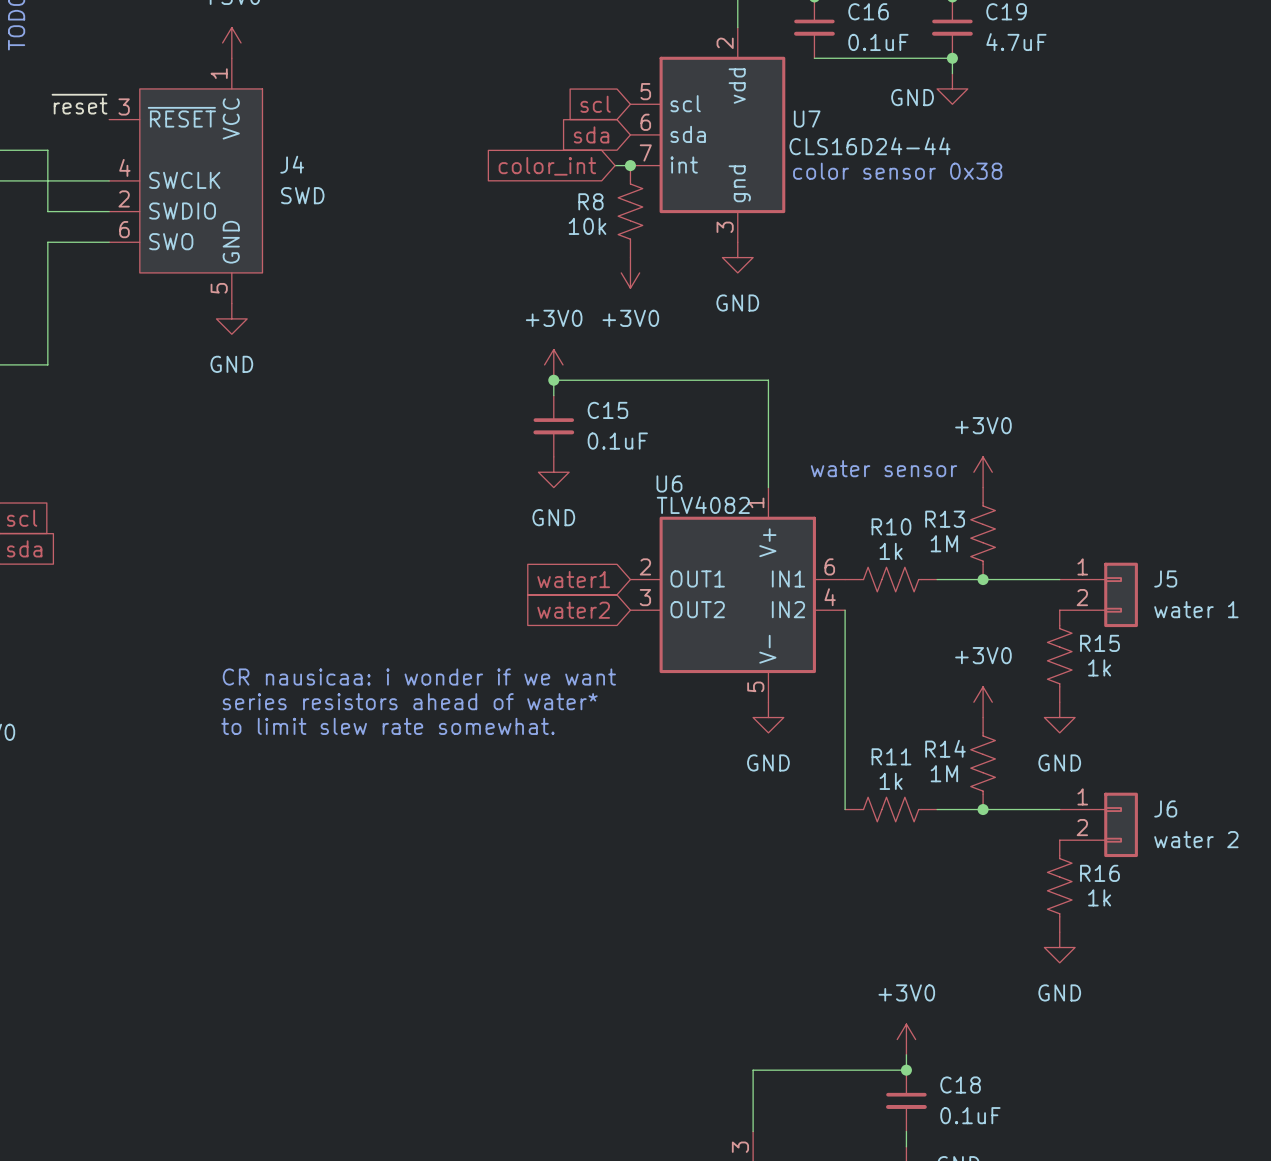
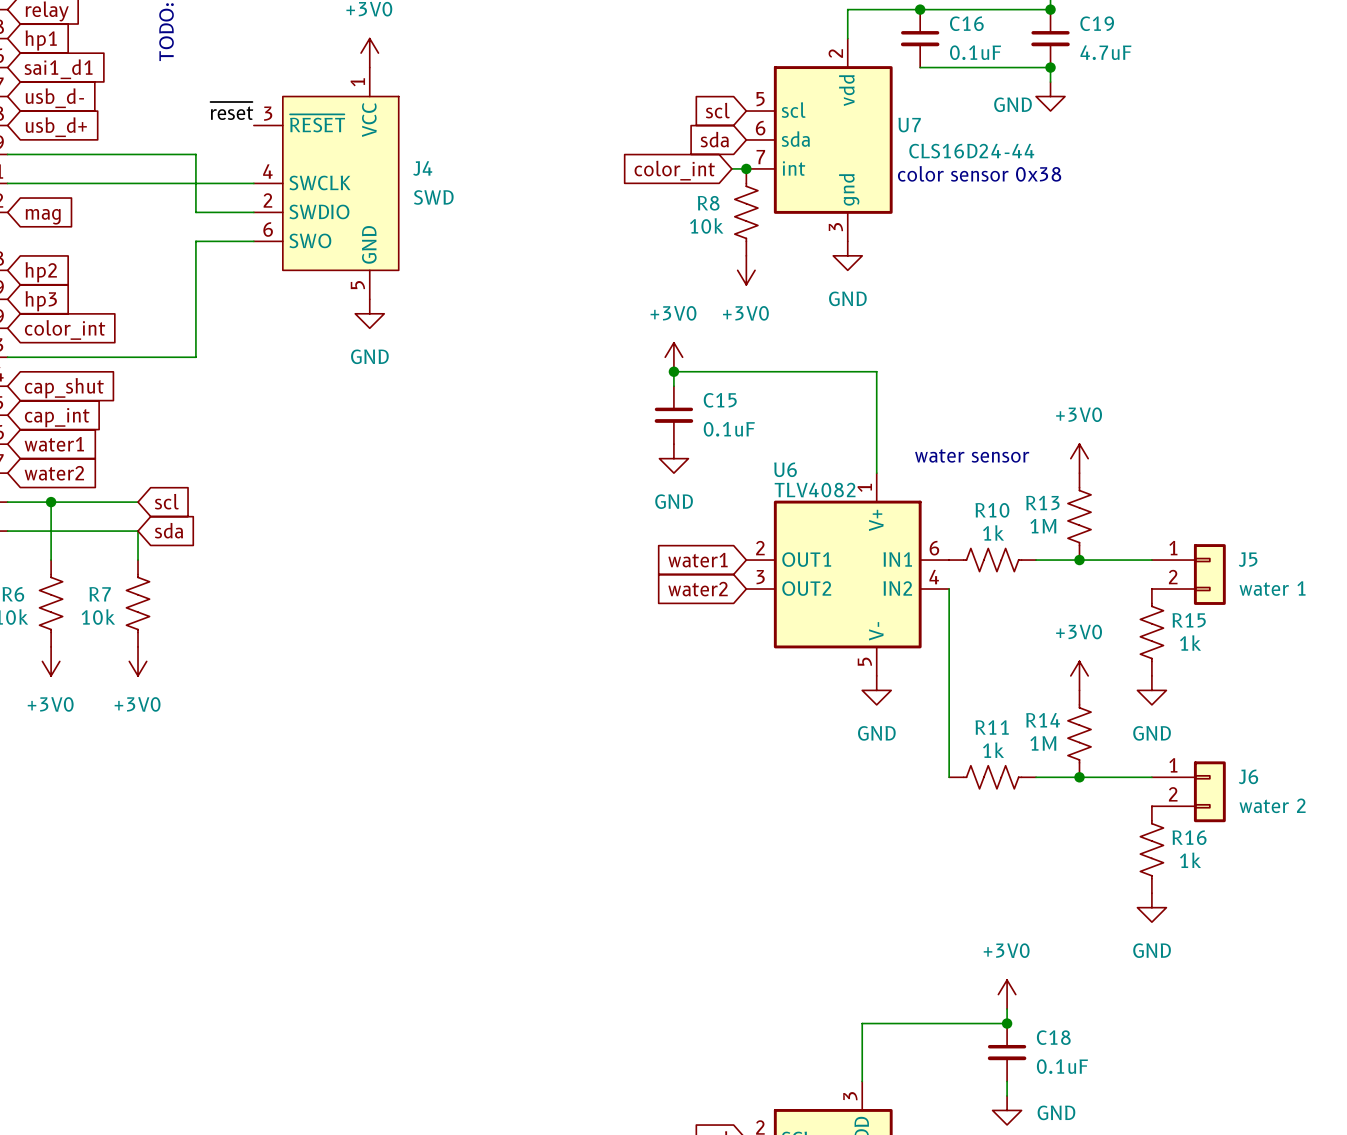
text: CR nausicaa: i wonder if we want (419, 677) -> none
text: series resistors ahead of water* (410, 701) -> none
text: to limit slew rate somewhat. (387, 726) -> none

